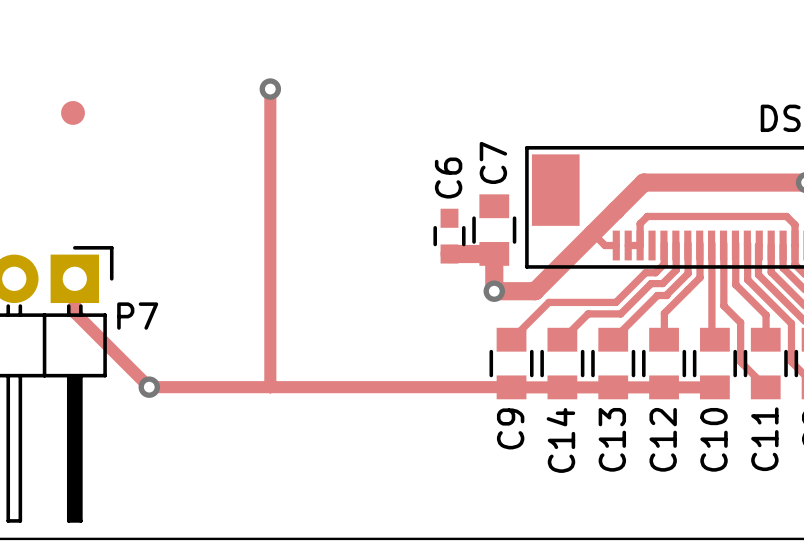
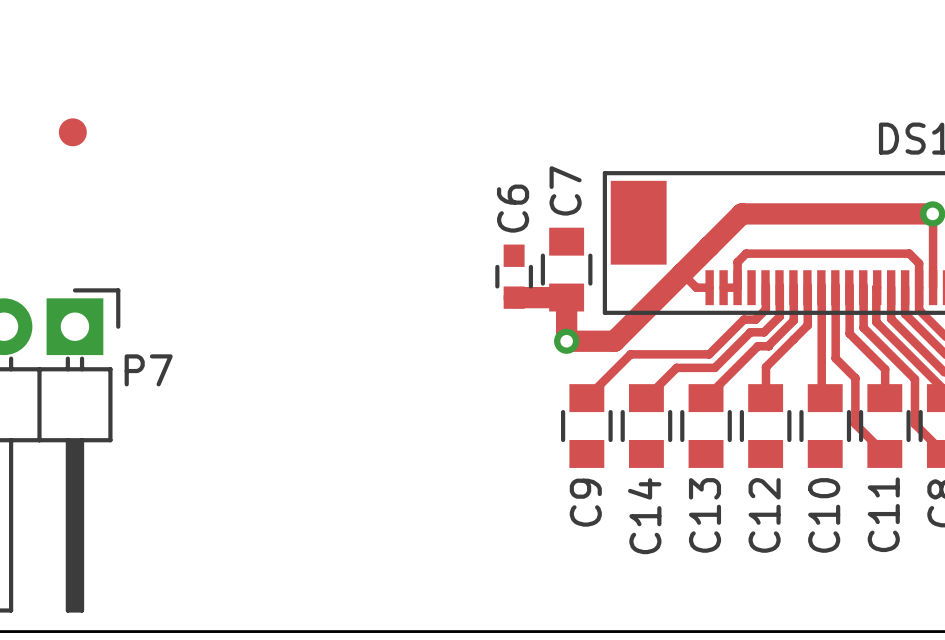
track: (270, 89) (270, 387) -> none
via: (270, 89) -> none
track: (74, 278) (74, 312) (149, 387) (511, 387) -> none
via: (149, 387) -> none
track: (511, 387) (714, 387) -> none

